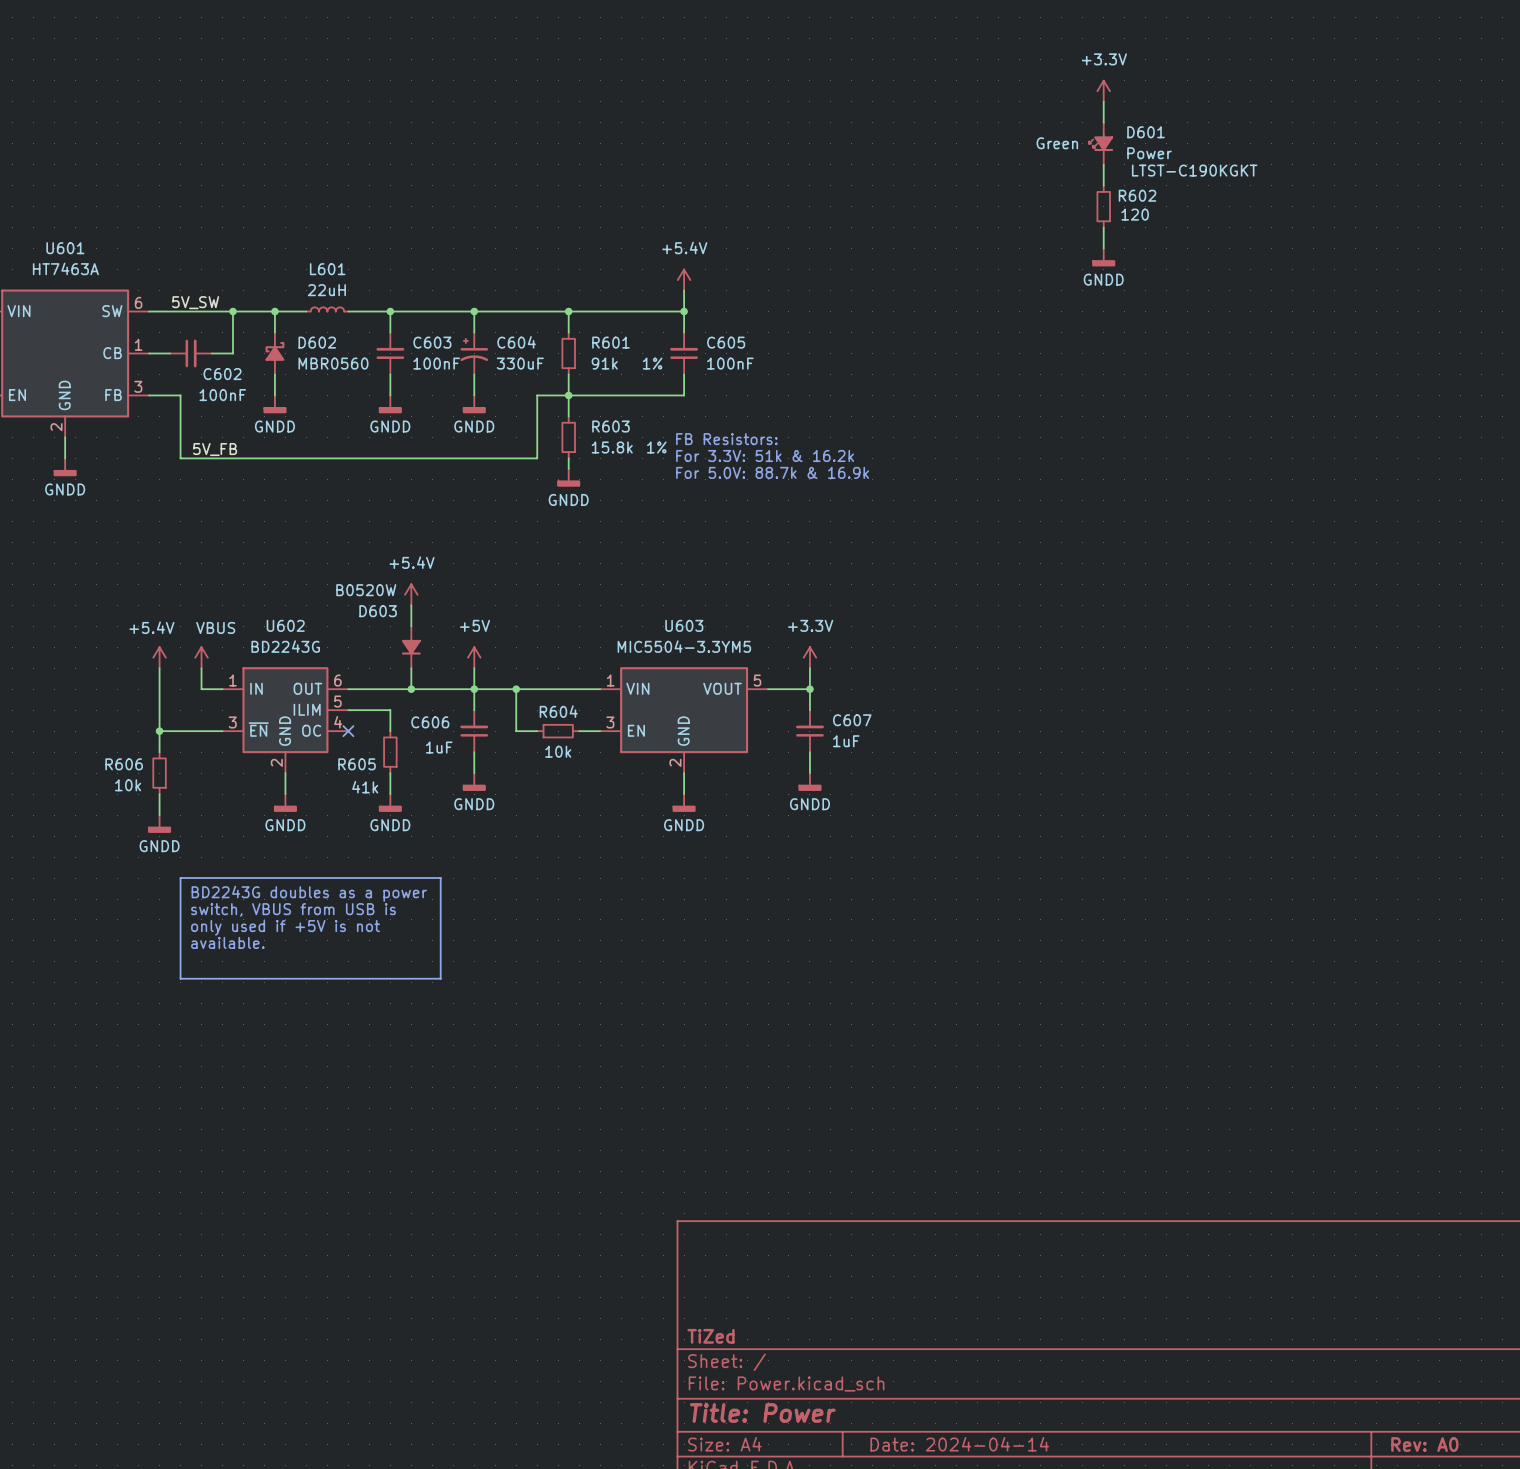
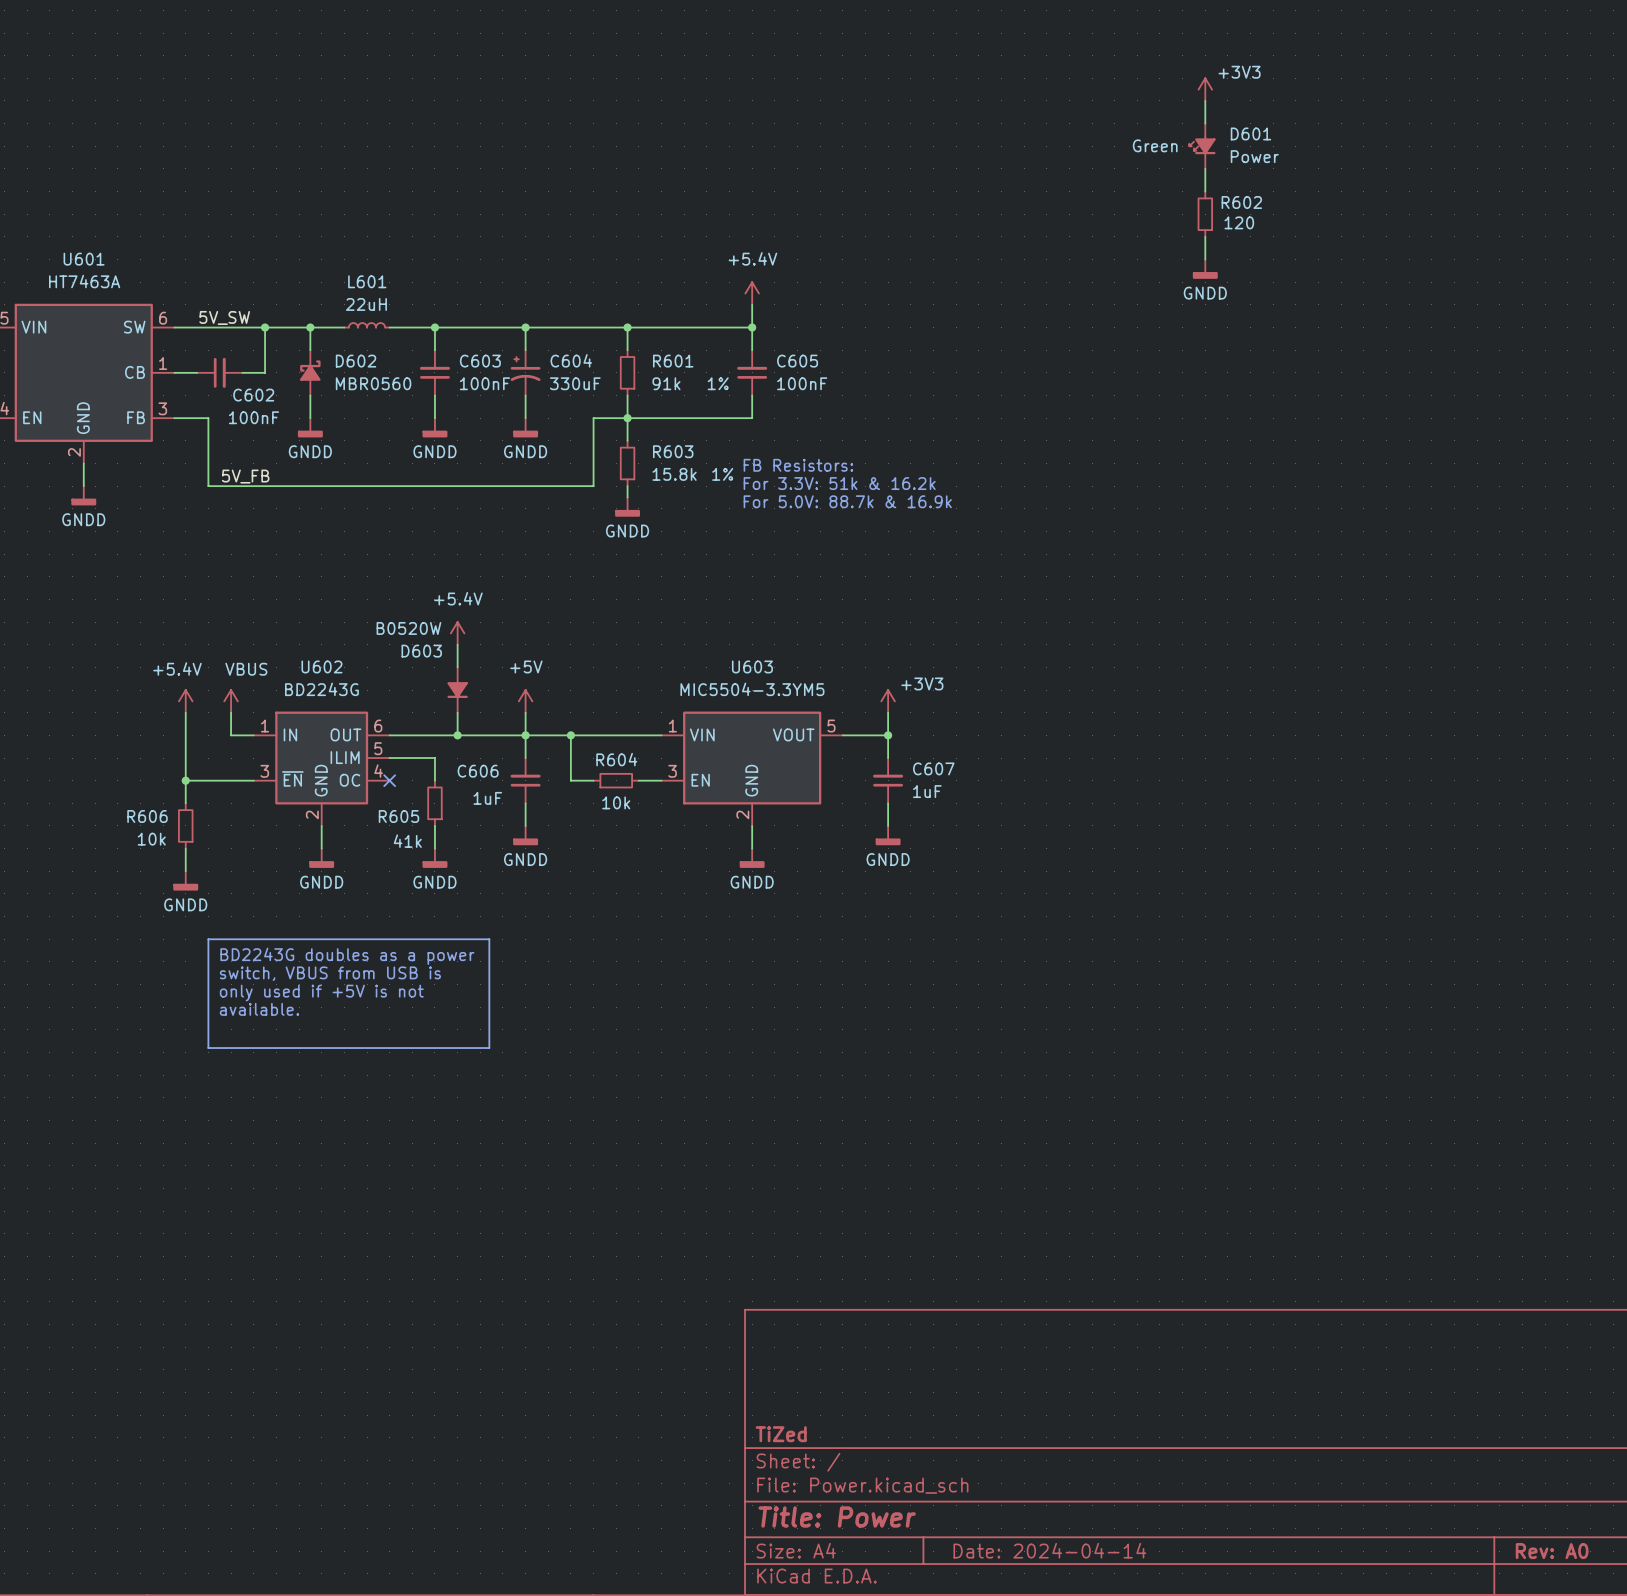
power symbol: +3.3V (1103, 91) -> +3V3 (1205, 89)
D601 text: LTST-C190KGKT (1194, 170) -> none
power symbol: +3.3V (809, 657) -> +3V3 (888, 701)

